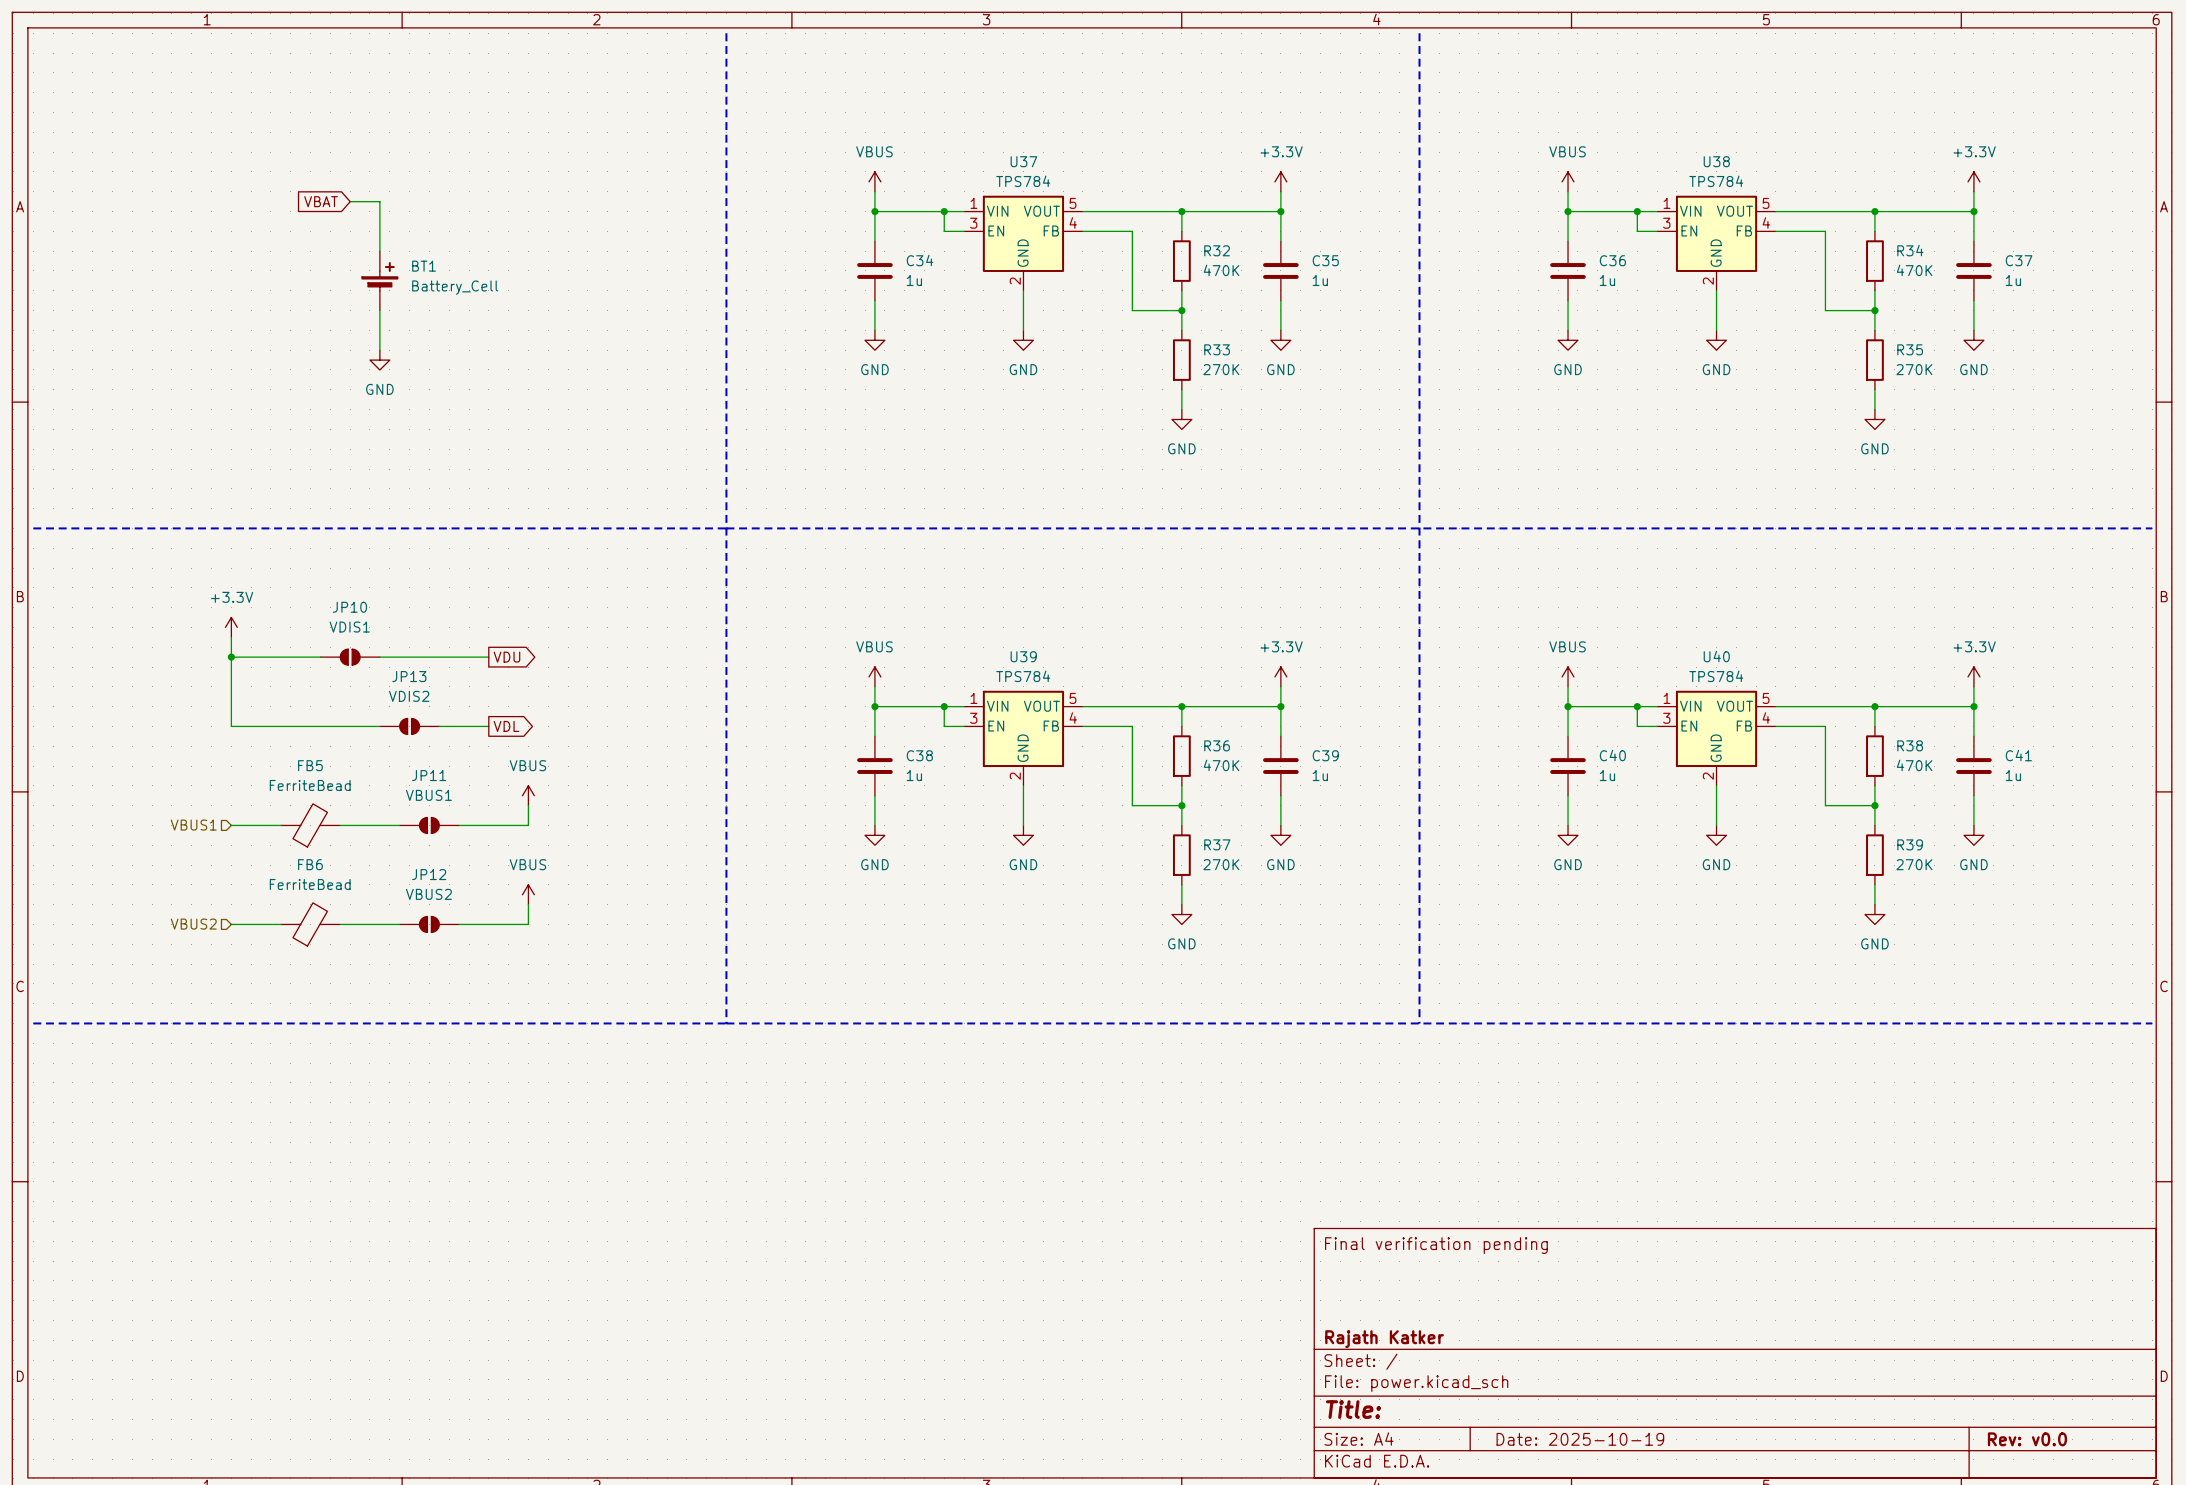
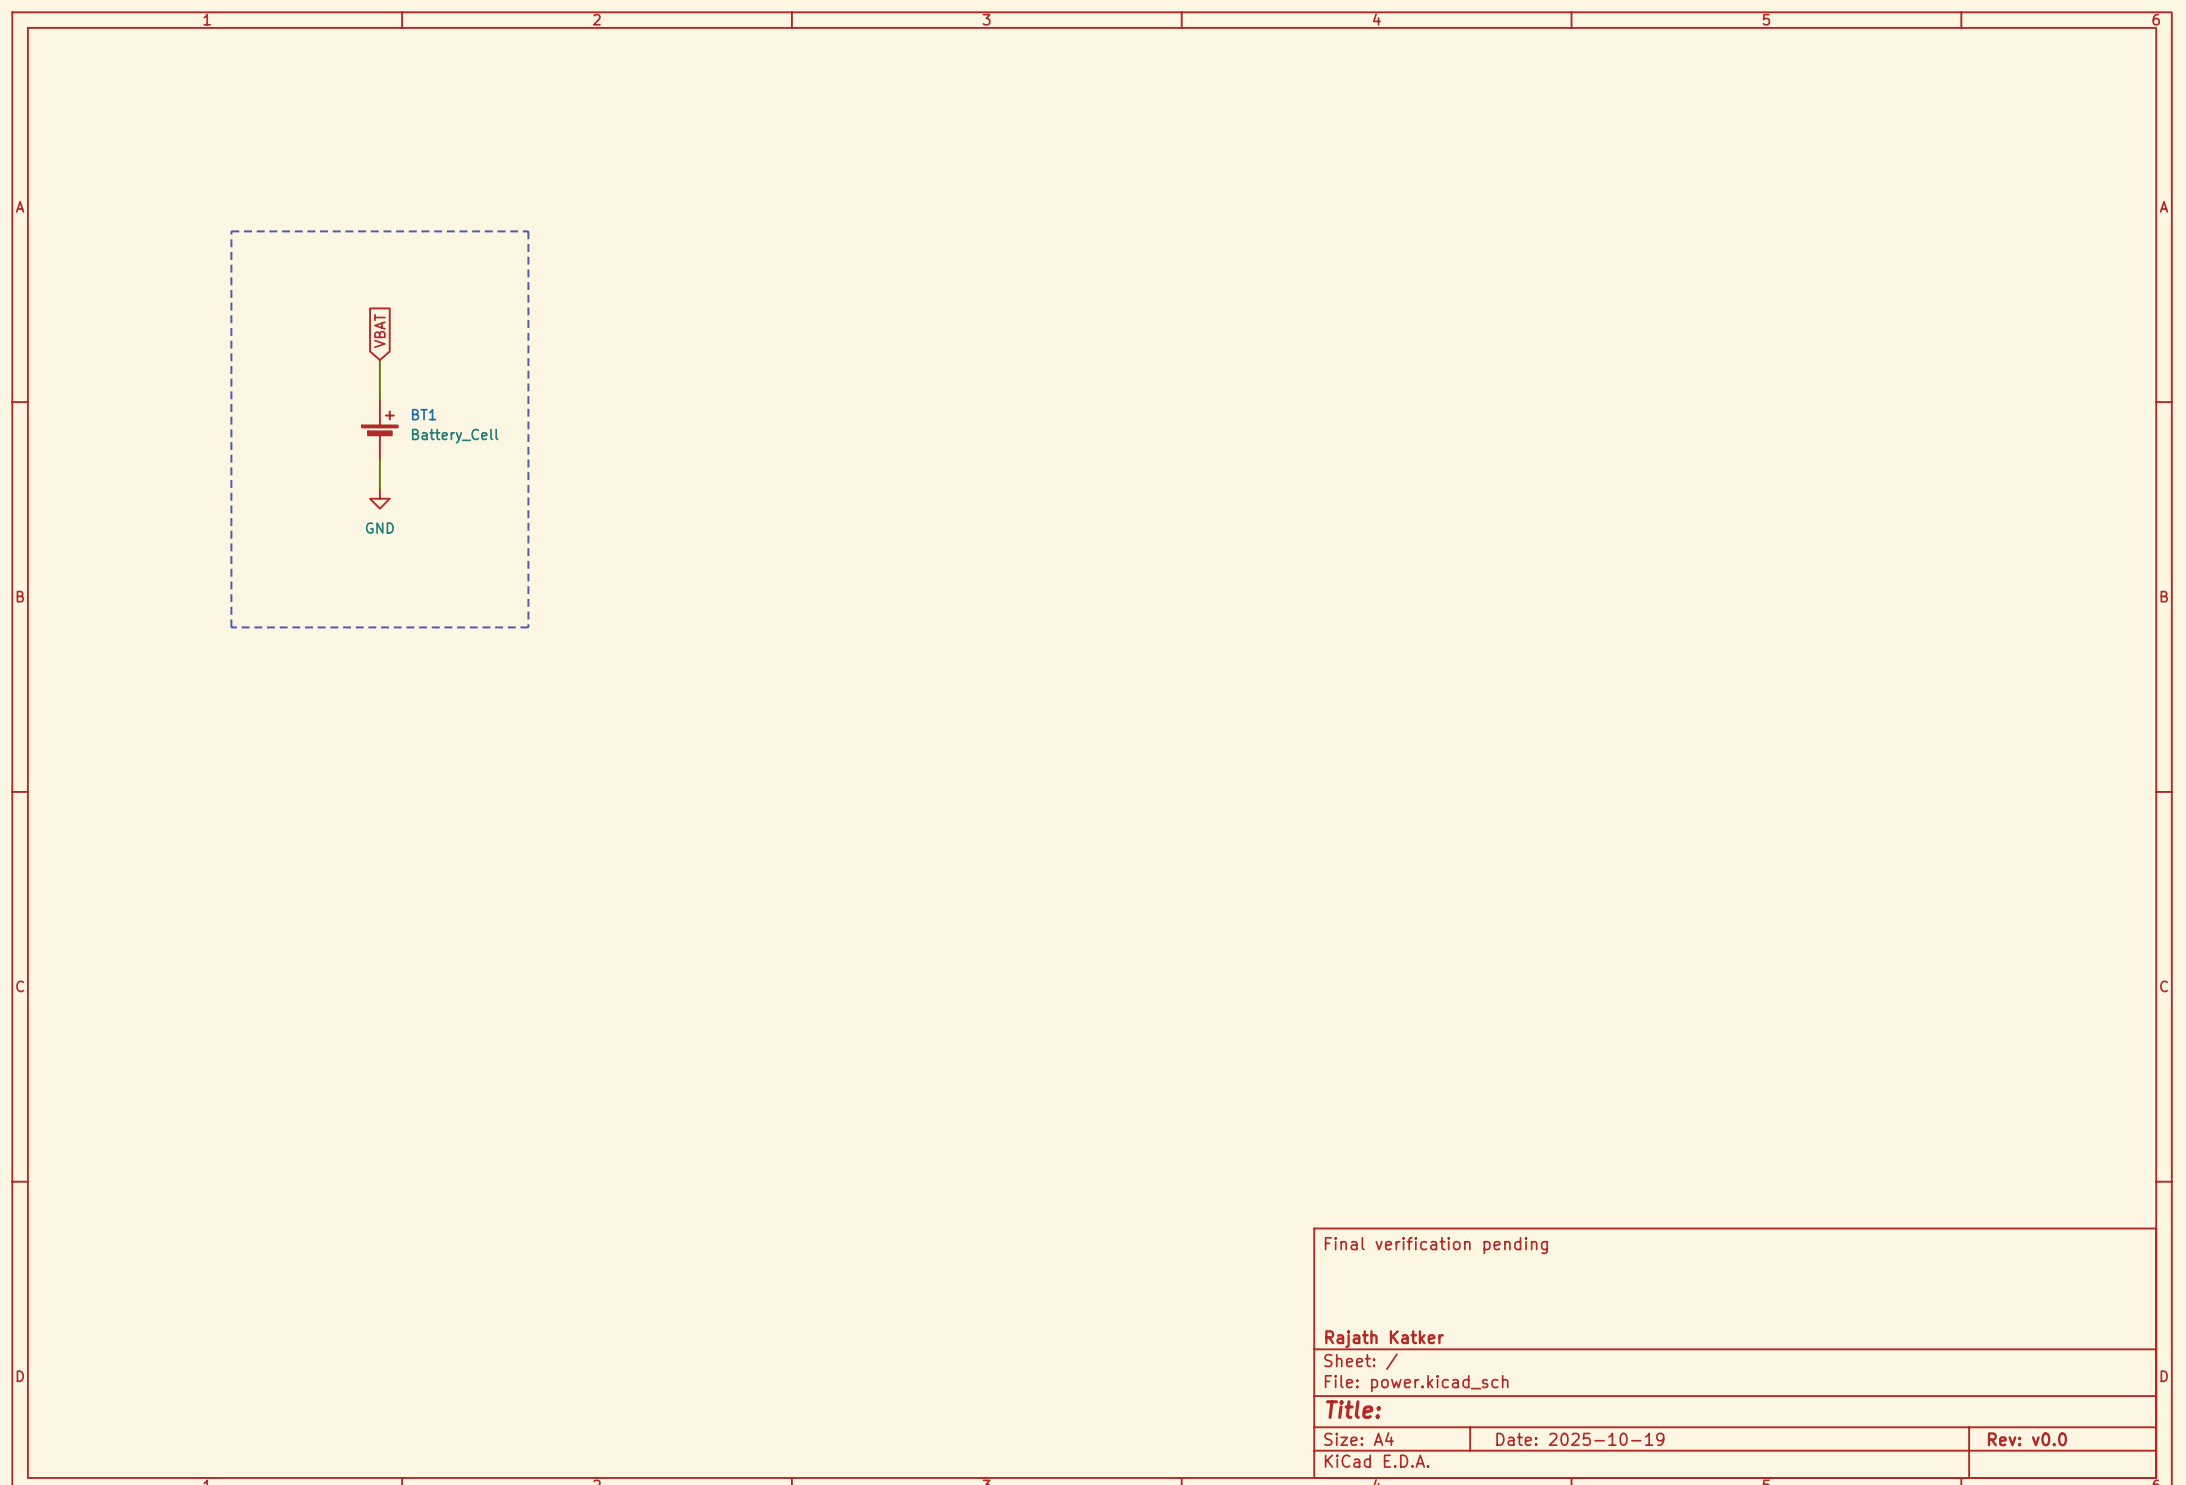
line: (726, 33) (726, 1023) -> none
line: (1419, 33) (1419, 1023) -> none
power symbol: VBUS (874, 181) -> none
power symbol: +3.3V (1280, 181) -> none
power symbol: VBUS (1568, 181) -> none
power symbol: +3.3V (1973, 181) -> none
wire: (874, 191) (874, 241) -> none
wire: (1280, 191) (1280, 241) -> none
wire: (1568, 191) (1568, 241) -> none
wire: (1973, 191) (1973, 241) -> none
global label rotation: 0° (321, 201) -> 90° clockwise (379, 330)
global label position: VBAT (321, 201) -> VBAT (379, 330)
wire: (350, 201) (379, 201) (379, 251) -> none
wire: (874, 211) (964, 211) -> none
junction: (874, 211) -> none
wire: (944, 211) (944, 231) (964, 231) -> none
junction: (944, 211) -> none
wire: (1082, 211) (1280, 211) -> none
wire: (1181, 211) (1181, 231) -> none
junction: (1181, 211) -> none
junction: (1280, 211) -> none
wire: (1568, 211) (1657, 211) -> none
junction: (1568, 211) -> none
wire: (1637, 211) (1637, 231) (1657, 231) -> none
junction: (1637, 211) -> none
wire: (1775, 211) (1973, 211) -> none
wire: (1874, 211) (1874, 231) -> none
junction: (1874, 211) -> none
junction: (1973, 211) -> none
line: none -> (231, 231) (528, 231) (528, 627) (231, 627) (231, 231)
wire: (1082, 231) (1132, 231) (1132, 310) (1181, 310) -> none
wire: (1775, 231) (1825, 231) (1825, 310) (1874, 310) -> none
U37: TPS784 (1023, 243) -> none
U38: TPS784 (1716, 243) -> none
R32: 470K (1181, 261) -> none
R34: 470K (1874, 261) -> none
C34: 1u (874, 270) -> none
C35: 1u (1280, 270) -> none
C36: 1u (1568, 270) -> none
C37: 1u (1973, 270) -> none
BT1 position: (379, 280) -> (379, 429)
wire: (1023, 290) (1023, 330) -> none
wire: (1181, 290) (1181, 330) -> none
wire: (1716, 290) (1716, 330) -> none
wire: (1874, 290) (1874, 330) -> none
wire: (874, 300) (874, 330) -> none
wire: (1280, 300) (1280, 330) -> none
wire: (1568, 300) (1568, 330) -> none
wire: (1973, 300) (1973, 330) -> none
wire: (379, 310) (379, 350) -> (379, 360) (379, 399)
junction: (1181, 310) -> none
junction: (1874, 310) -> none
power symbol: GND (874, 340) -> none
power symbol: GND (1023, 340) -> none
power symbol: GND (1280, 340) -> none
power symbol: GND (1568, 340) -> none
power symbol: GND (1716, 340) -> none
power symbol: GND (1973, 340) -> none
power symbol position: GND (379, 360) -> GND (379, 498)
R33: 270K (1181, 360) -> none
R35: 270K (1874, 360) -> none
wire: (1181, 389) (1181, 409) -> none
wire: (1874, 389) (1874, 409) -> none
power symbol: GND (1181, 419) -> none
power symbol: GND (1874, 419) -> none
wire: none -> (379, 459) (379, 488)
line: (33, 528) (2152, 528) -> none
power symbol: +3.3V (231, 627) -> none
wire: (231, 637) (231, 726) (379, 726) -> none
wire: (231, 657) (320, 657) -> none
junction: (231, 657) -> none
JP10: VDIS1 (350, 657) -> none
wire: (379, 657) (488, 657) -> none
global label: VDU (506, 657) -> none
power symbol: VBUS (874, 676) -> none
power symbol: +3.3V (1280, 676) -> none
power symbol: VBUS (1568, 676) -> none
power symbol: +3.3V (1973, 676) -> none
wire: (874, 686) (874, 736) -> none
wire: (1280, 686) (1280, 736) -> none
wire: (1568, 686) (1568, 736) -> none
wire: (1973, 686) (1973, 736) -> none
wire: (874, 706) (964, 706) -> none
junction: (874, 706) -> none
wire: (944, 706) (944, 726) (964, 726) -> none
junction: (944, 706) -> none
wire: (1082, 706) (1280, 706) -> none
wire: (1181, 706) (1181, 726) -> none
junction: (1181, 706) -> none
junction: (1280, 706) -> none
wire: (1568, 706) (1657, 706) -> none
junction: (1568, 706) -> none
wire: (1637, 706) (1637, 726) (1657, 726) -> none
junction: (1637, 706) -> none
wire: (1775, 706) (1973, 706) -> none
wire: (1874, 706) (1874, 726) -> none
junction: (1874, 706) -> none
junction: (1973, 706) -> none
JP13: VDIS2 (409, 726) -> none
wire: (439, 726) (488, 726) -> none
global label: VDL (506, 726) -> none
wire: (1082, 726) (1132, 726) (1132, 805) (1181, 805) -> none
wire: (1775, 726) (1825, 726) (1825, 805) (1874, 805) -> none
U39: TPS784 (1023, 738) -> none
U40: TPS784 (1716, 738) -> none
R36: 470K (1181, 756) -> none
R38: 470K (1874, 756) -> none
C38: 1u (874, 766) -> none
C39: 1u (1280, 766) -> none
C40: 1u (1568, 766) -> none
C41: 1u (1973, 766) -> none
wire: (1023, 785) (1023, 825) -> none
wire: (1181, 785) (1181, 825) -> none
wire: (1716, 785) (1716, 825) -> none
wire: (1874, 785) (1874, 825) -> none
power symbol: VBUS (528, 795) -> none
wire: (874, 795) (874, 825) -> none
wire: (1280, 795) (1280, 825) -> none
wire: (1568, 795) (1568, 825) -> none
wire: (1973, 795) (1973, 825) -> none
wire: (528, 805) (528, 825) (459, 825) -> none
junction: (1181, 805) -> none
junction: (1874, 805) -> none
hierarchical label: VBUS1 (193, 825) -> none
wire: (231, 825) (280, 825) -> none
FB5: FerriteBead (310, 825) -> none
wire: (340, 825) (399, 825) -> none
JP11: VBUS1 (429, 825) -> none
power symbol: GND (874, 835) -> none
power symbol: GND (1023, 835) -> none
power symbol: GND (1280, 835) -> none
power symbol: GND (1568, 835) -> none
power symbol: GND (1716, 835) -> none
power symbol: GND (1973, 835) -> none
R37: 270K (1181, 855) -> none
R39: 270K (1874, 855) -> none
wire: (1181, 884) (1181, 904) -> none
wire: (1874, 884) (1874, 904) -> none
power symbol: VBUS (528, 894) -> none
wire: (528, 904) (528, 924) (459, 924) -> none
power symbol: GND (1181, 914) -> none
power symbol: GND (1874, 914) -> none
hierarchical label: VBUS2 (193, 924) -> none
wire: (231, 924) (280, 924) -> none
FB6: FerriteBead (310, 924) -> none
wire: (340, 924) (399, 924) -> none
JP12: VBUS2 (429, 924) -> none
line: (33, 1023) (2152, 1023) -> none

